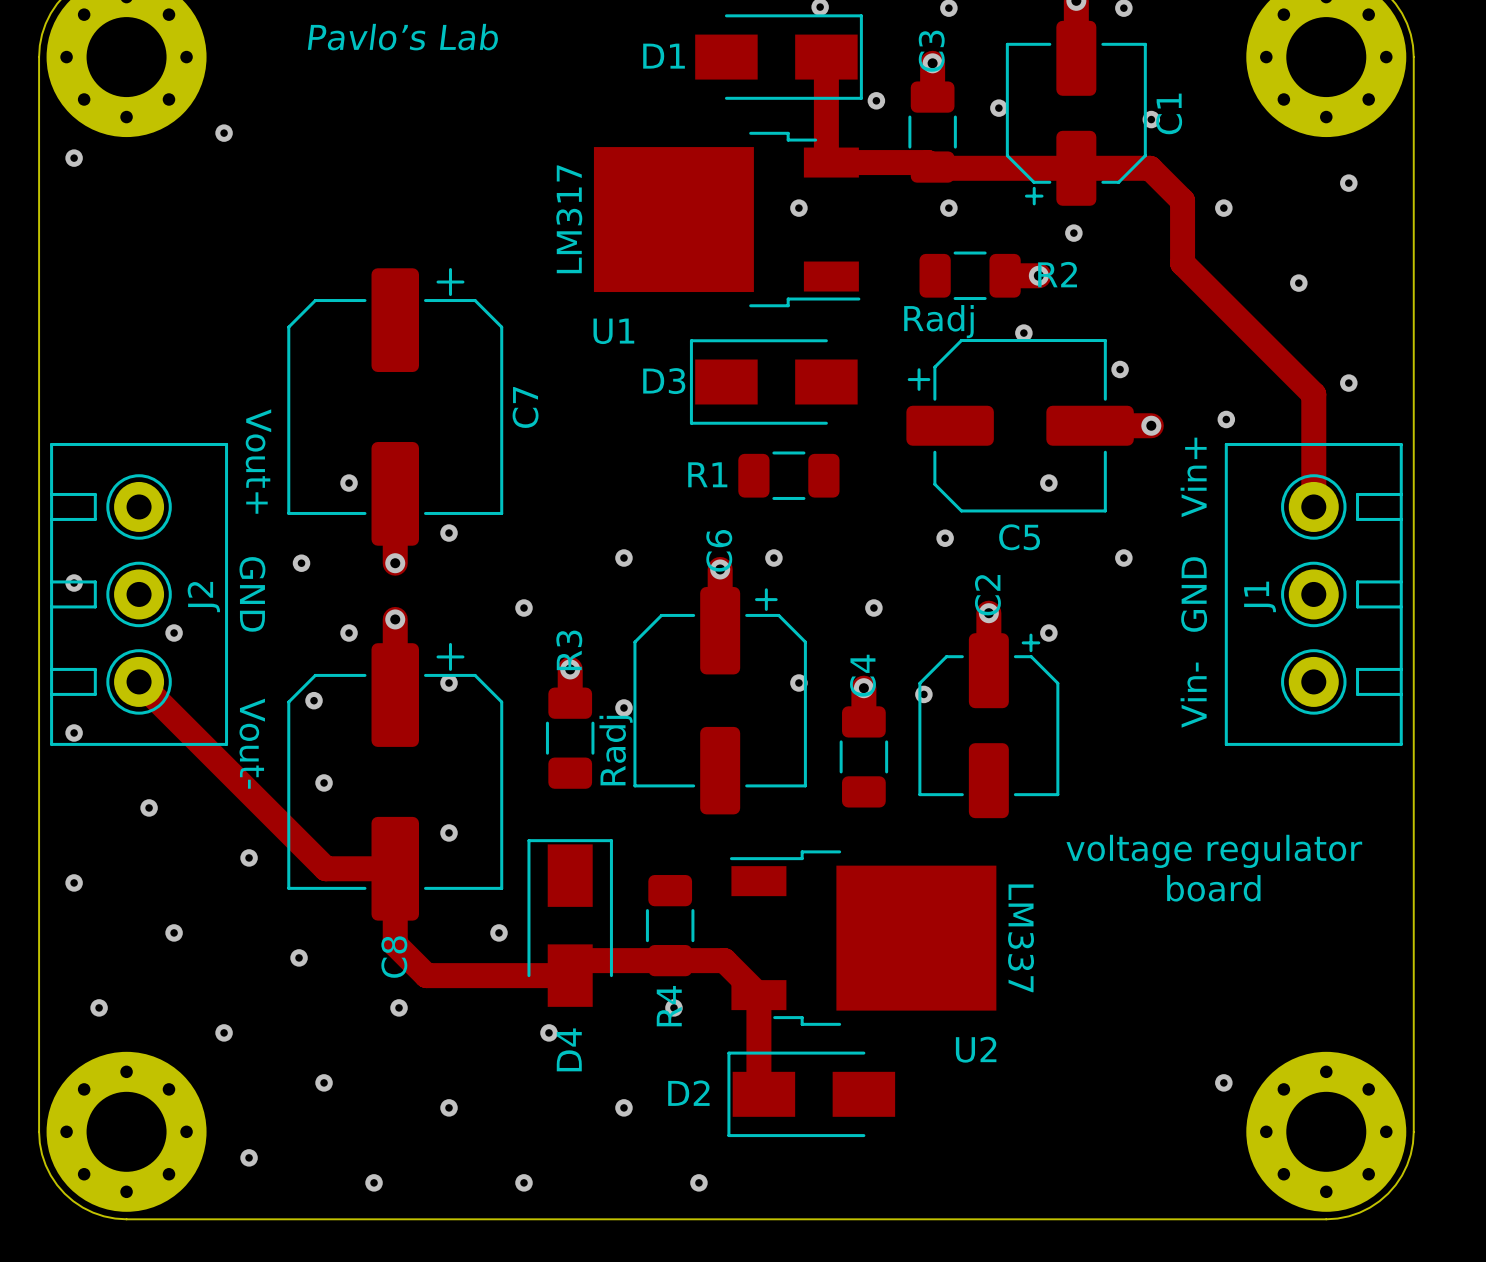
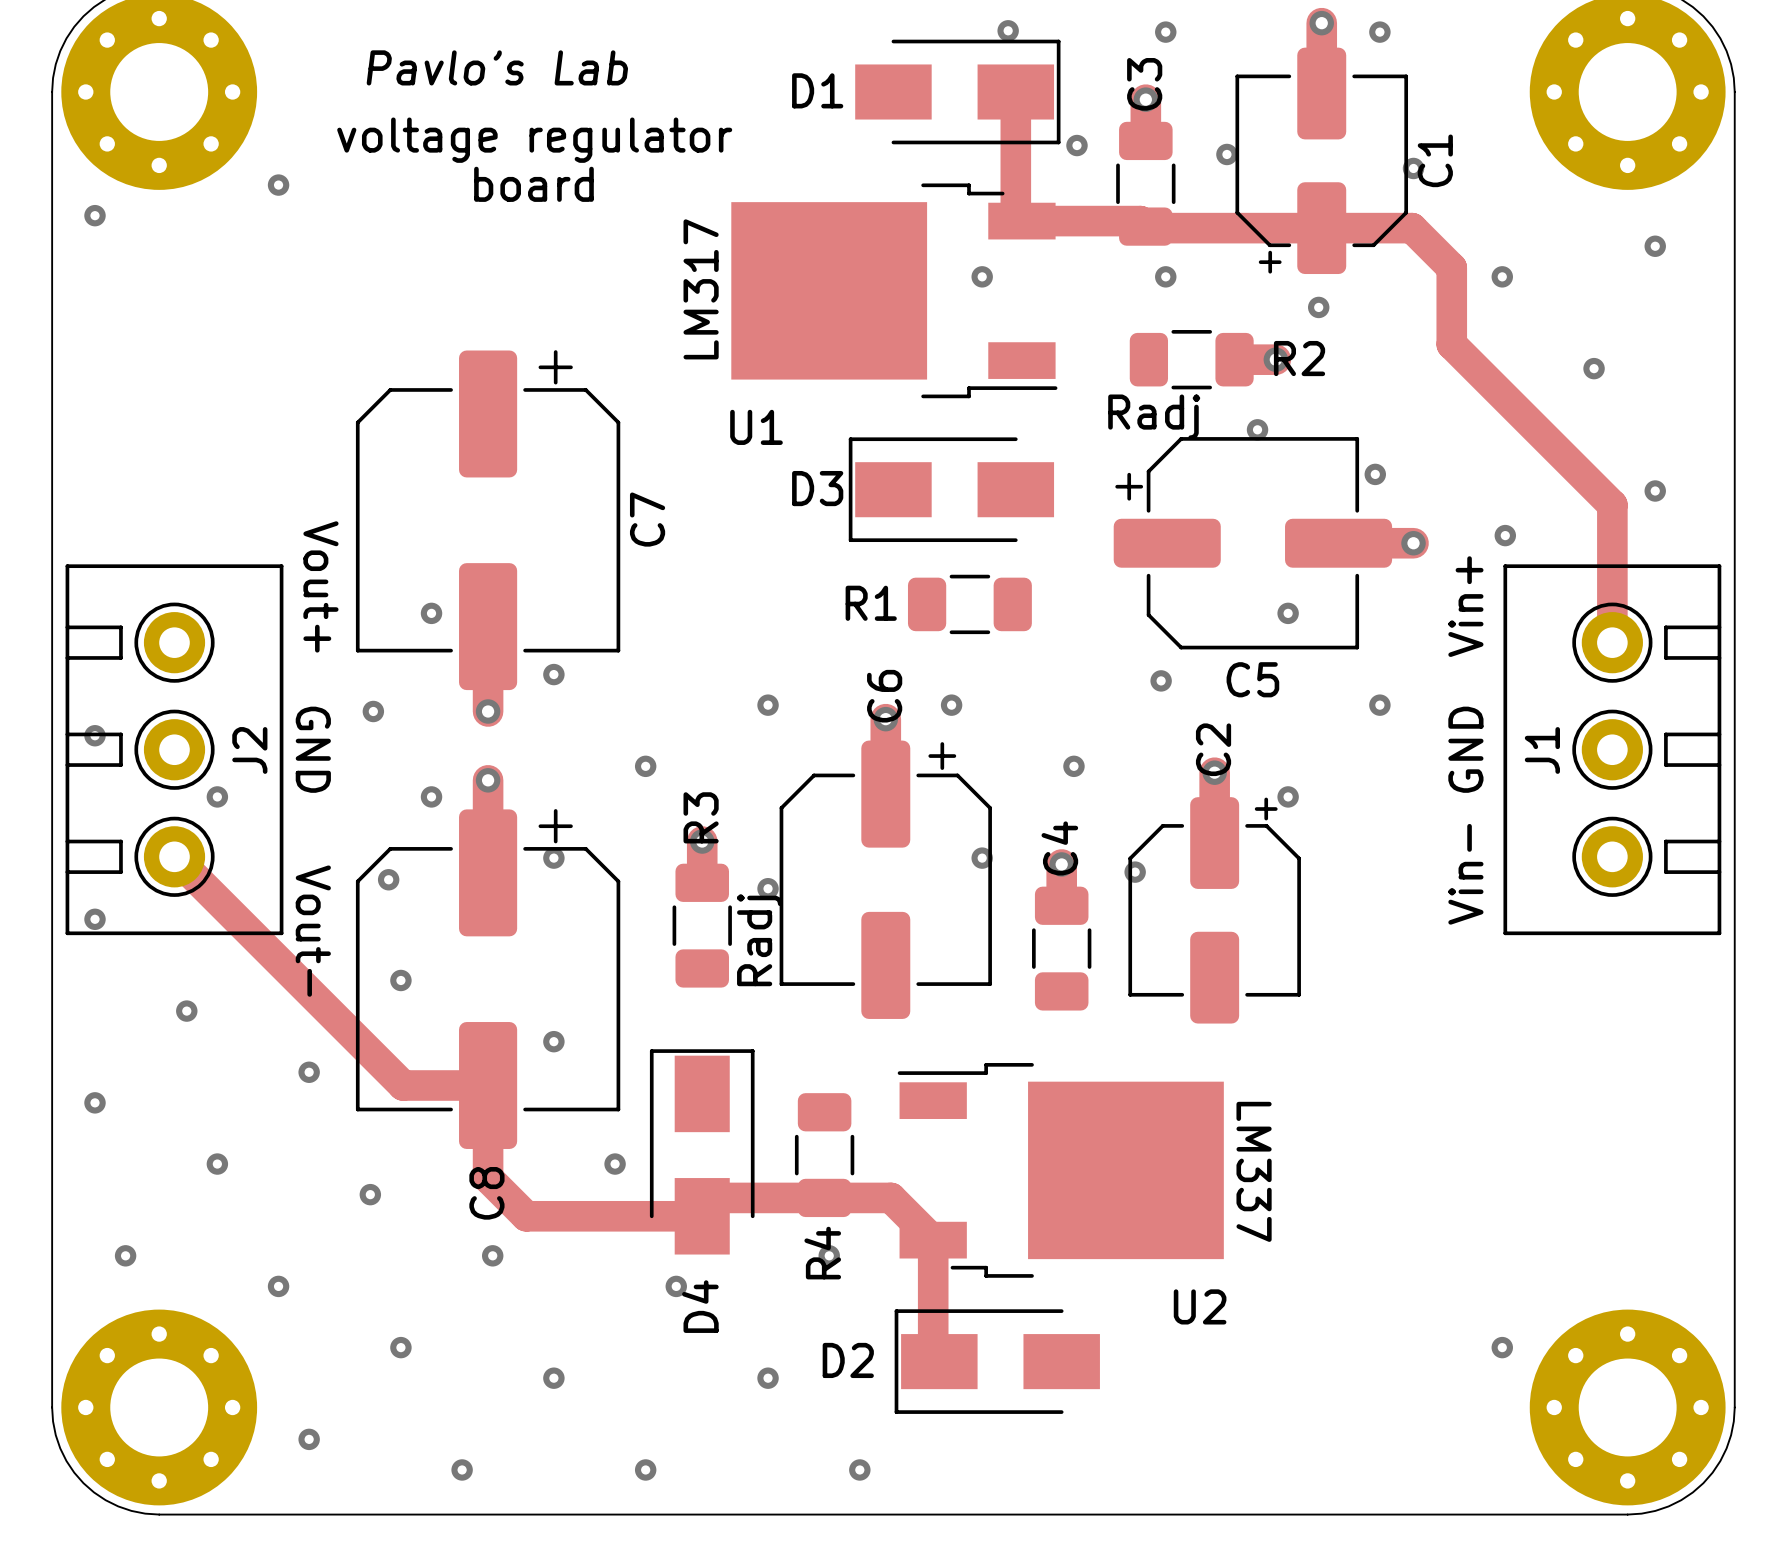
text: none -> voltage regulator (534, 140)
text: none -> board (533, 184)
text: voltage regulator (1214, 851) -> none
text: board (1213, 888) -> none

